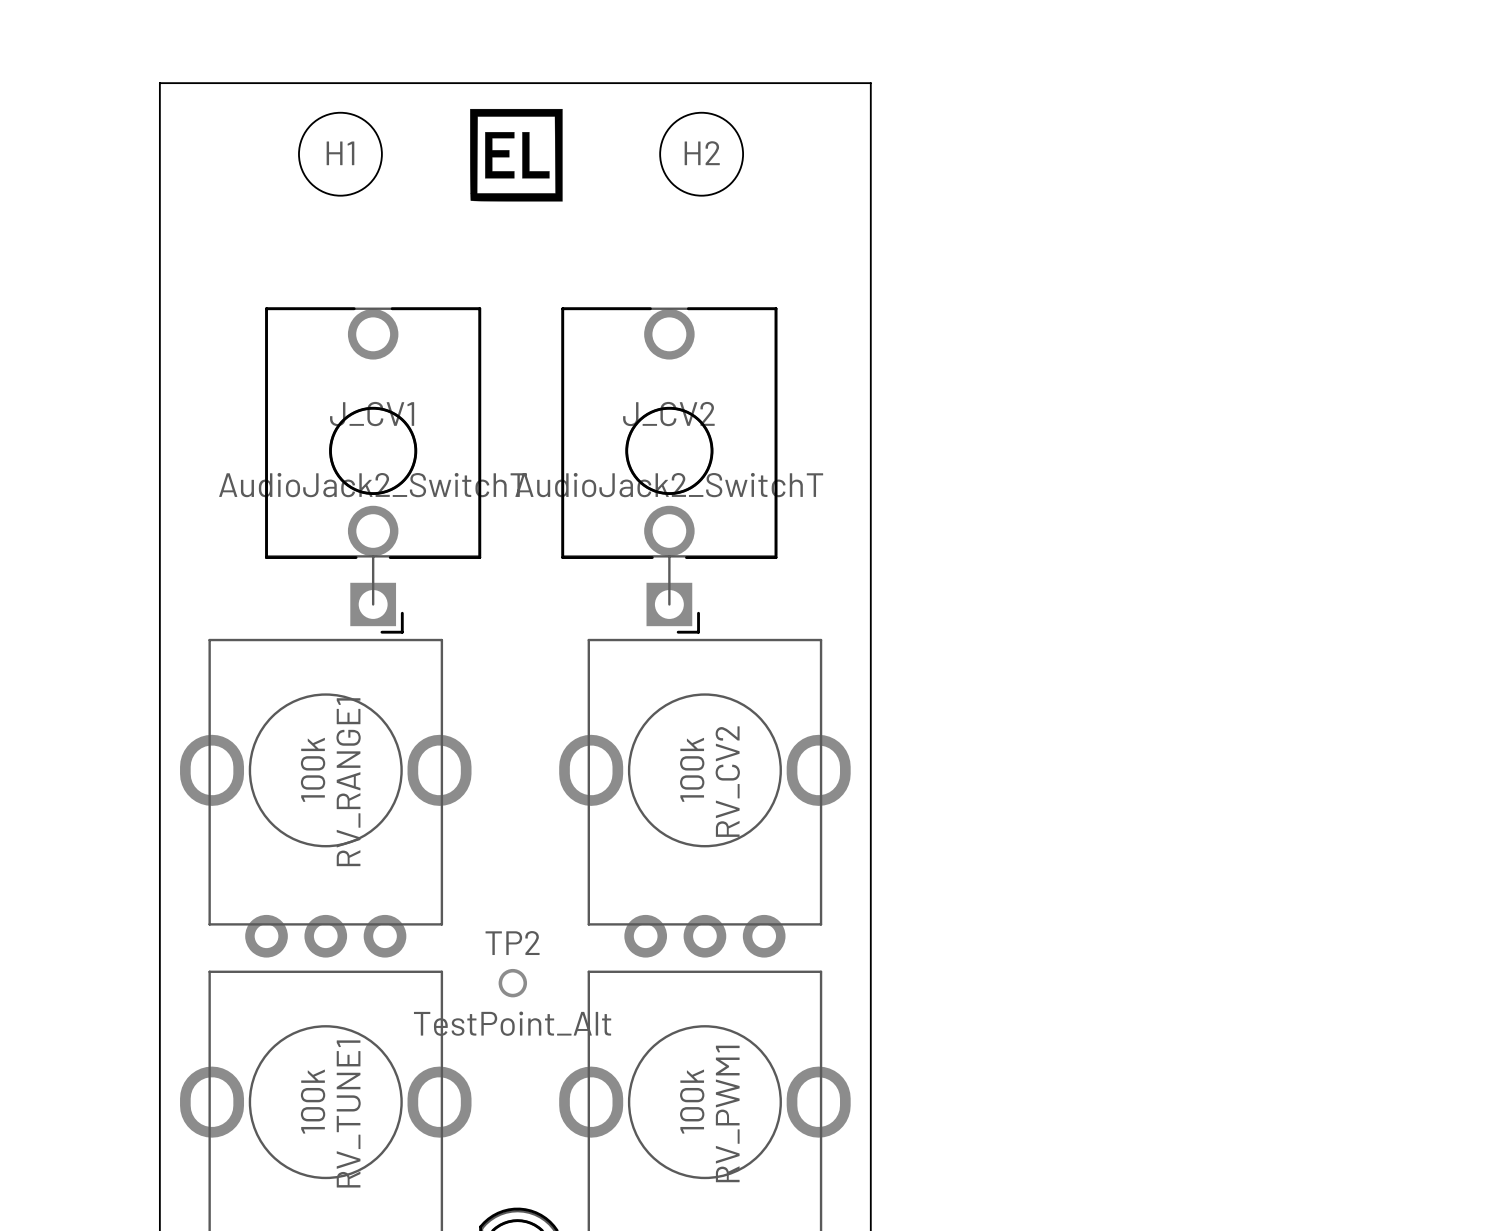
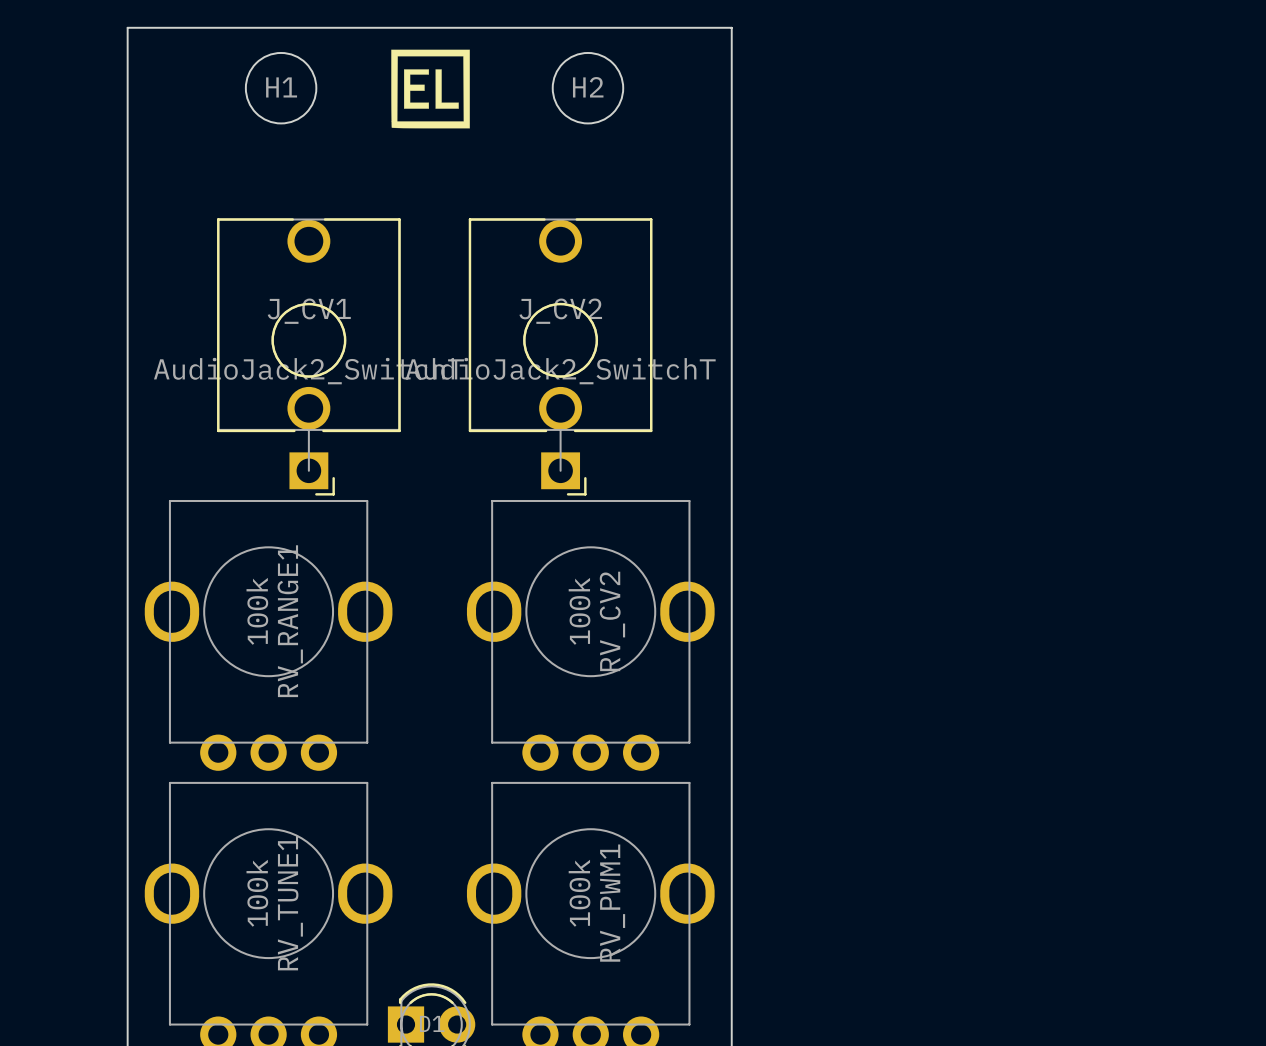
TP2: TestPoint_Alt (512, 983) -> none

